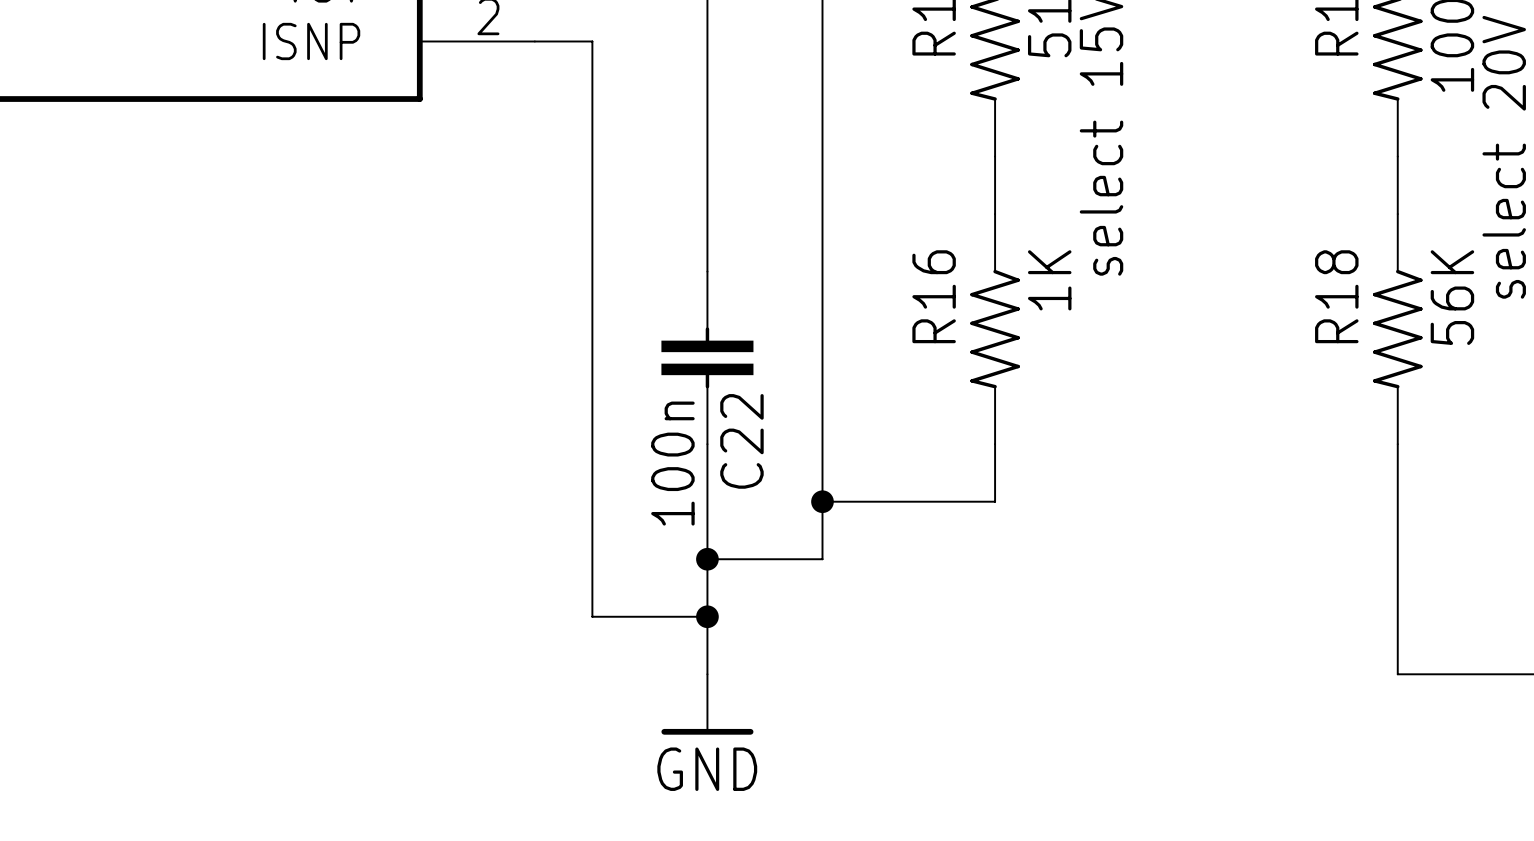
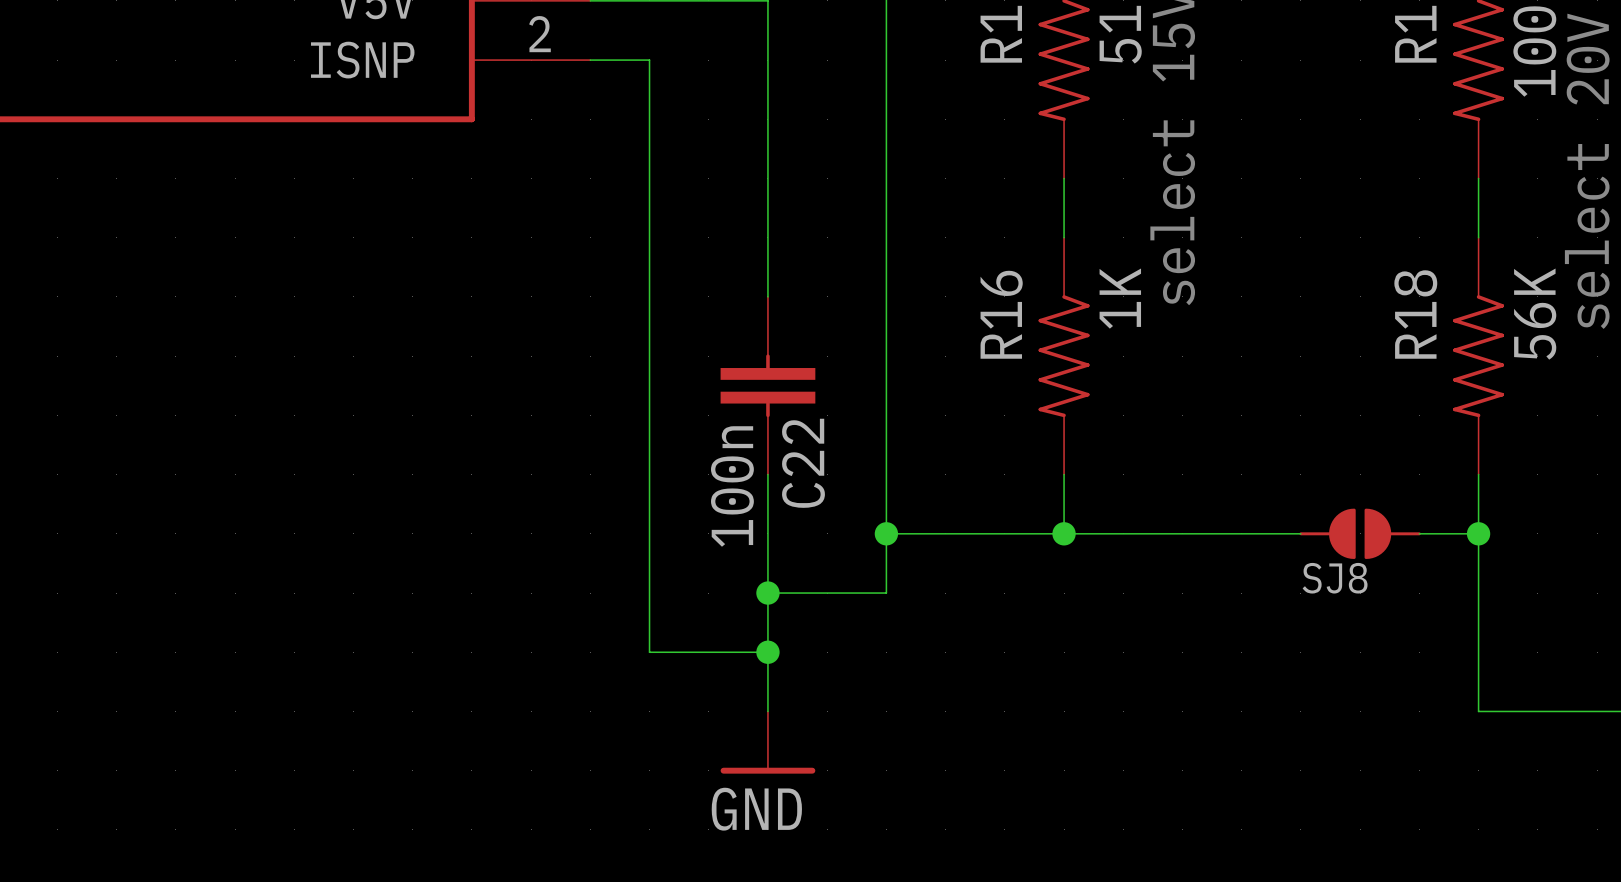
wire: none -> (1064, 533) (1300, 533)
junction: none -> (1064, 533)
SJ8: none -> (1360, 533)
wire: none -> (1419, 533) (1478, 533)
junction: none -> (1478, 533)

